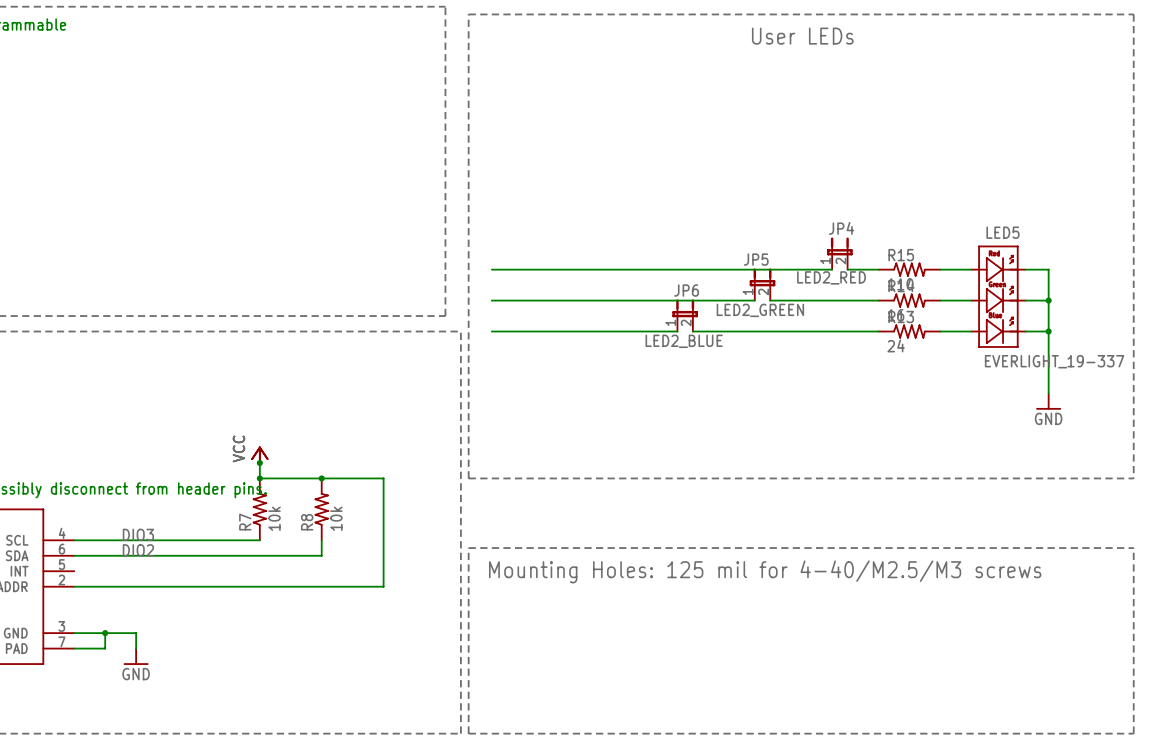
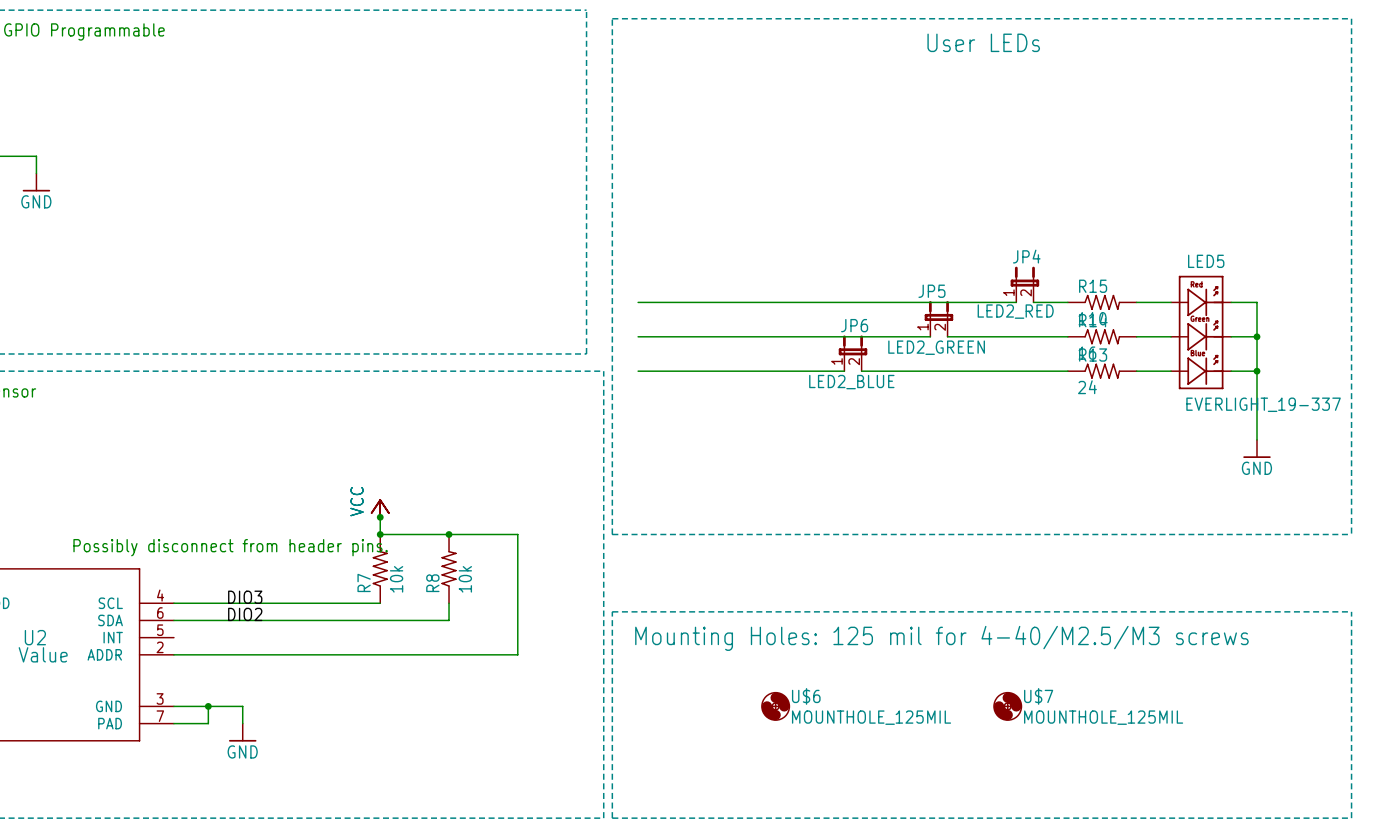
U$6: none -> MOUNTHOLE_125MIL (775, 706)
U$7: none -> MOUNTHOLE_125MIL (1007, 706)

